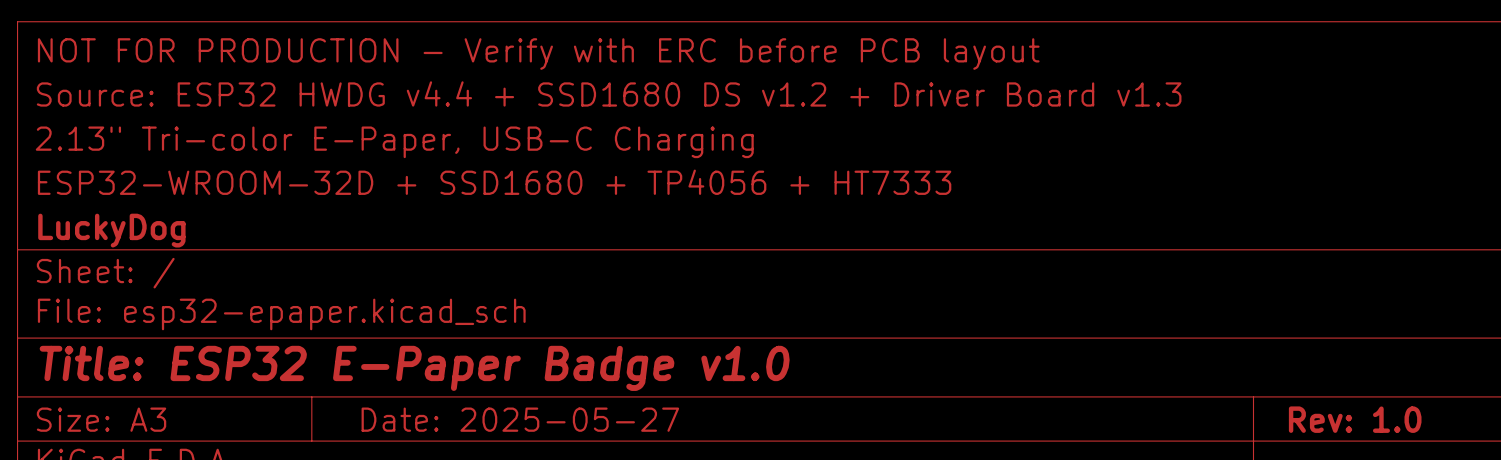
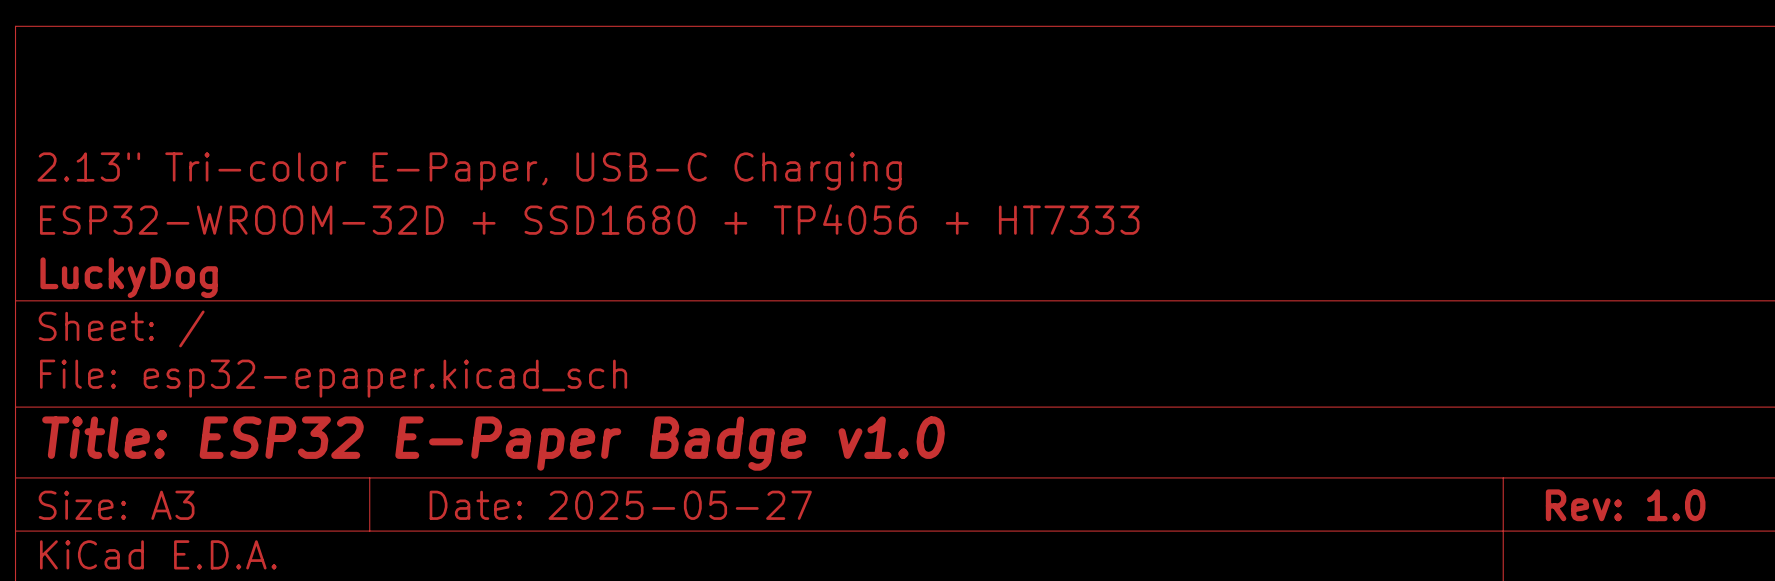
title block: NOT FOR PRODUCTION - Verify with ERC before PCB layout (538, 54) -> none
title block: Source: ESP32 HWDG v4.4 + SSD1680 DS v1.2 + Driver Board v1.3 (609, 93) -> none

